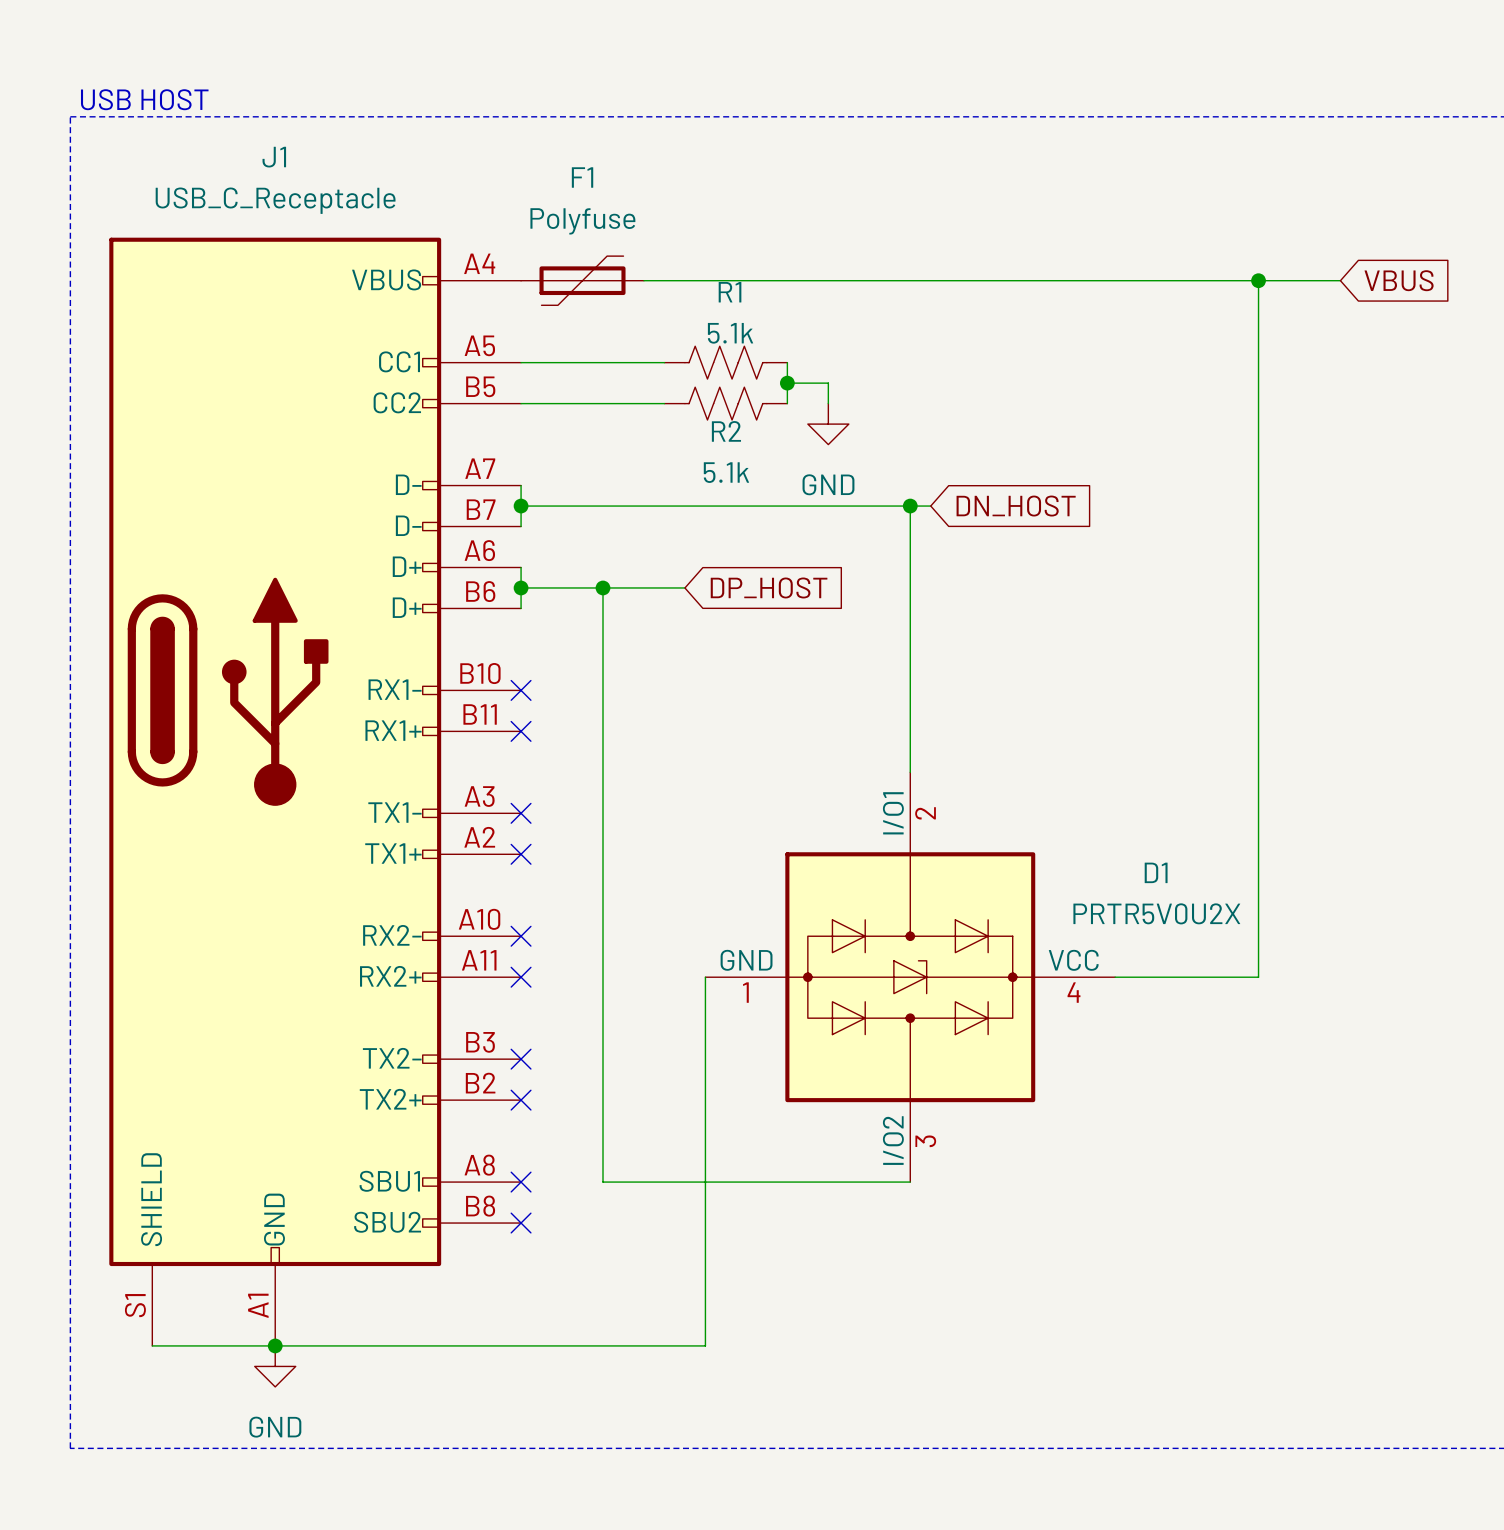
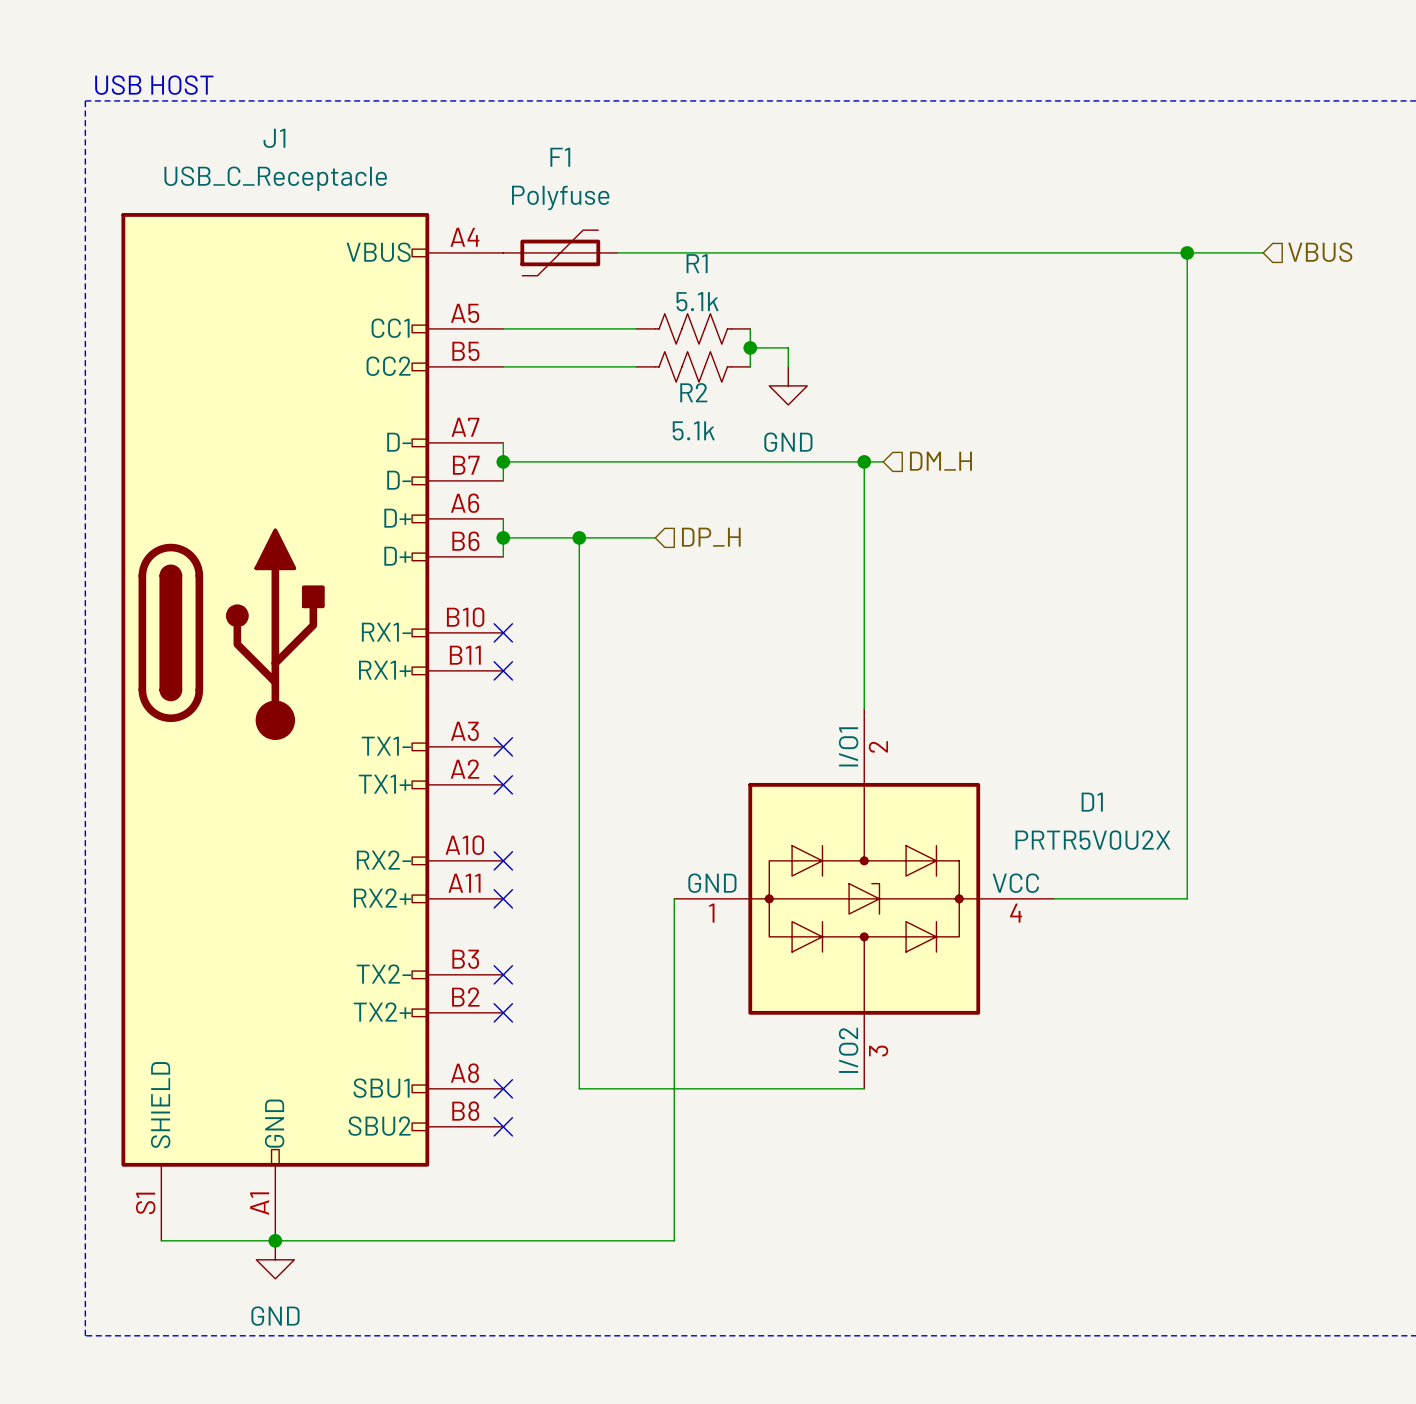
hierarchical label: none -> VBUS (1320, 252)
global label: VBUS (1399, 280) -> none
hierarchical label: none -> DM_H (940, 461)
global label: DN_HOST (1016, 506) -> none
hierarchical label: none -> DP_H (711, 537)
global label: DP_HOST (769, 587) -> none

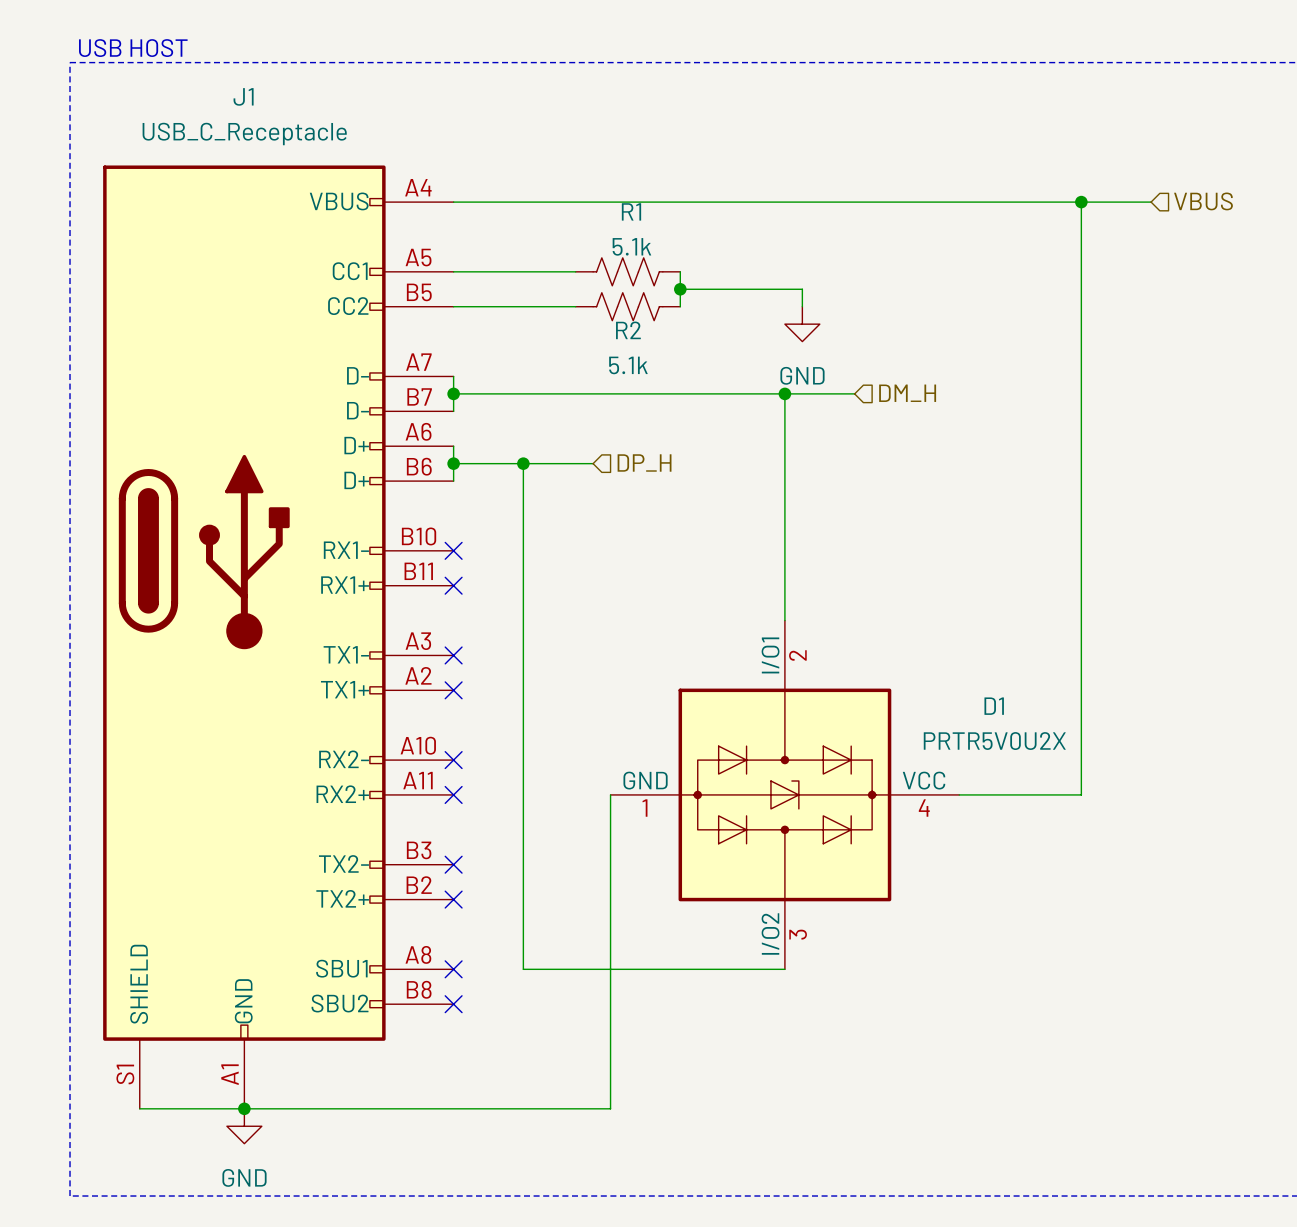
F1: Polyfuse (560, 252) -> none
wire: (788, 347) (788, 366) -> (715, 289) (802, 289) (802, 306)
power symbol position: GND (788, 385) -> GND (802, 324)
wire: none -> (802, 393) (854, 393)
hierarchical label position: DM_H (940, 461) -> DM_H (907, 393)

